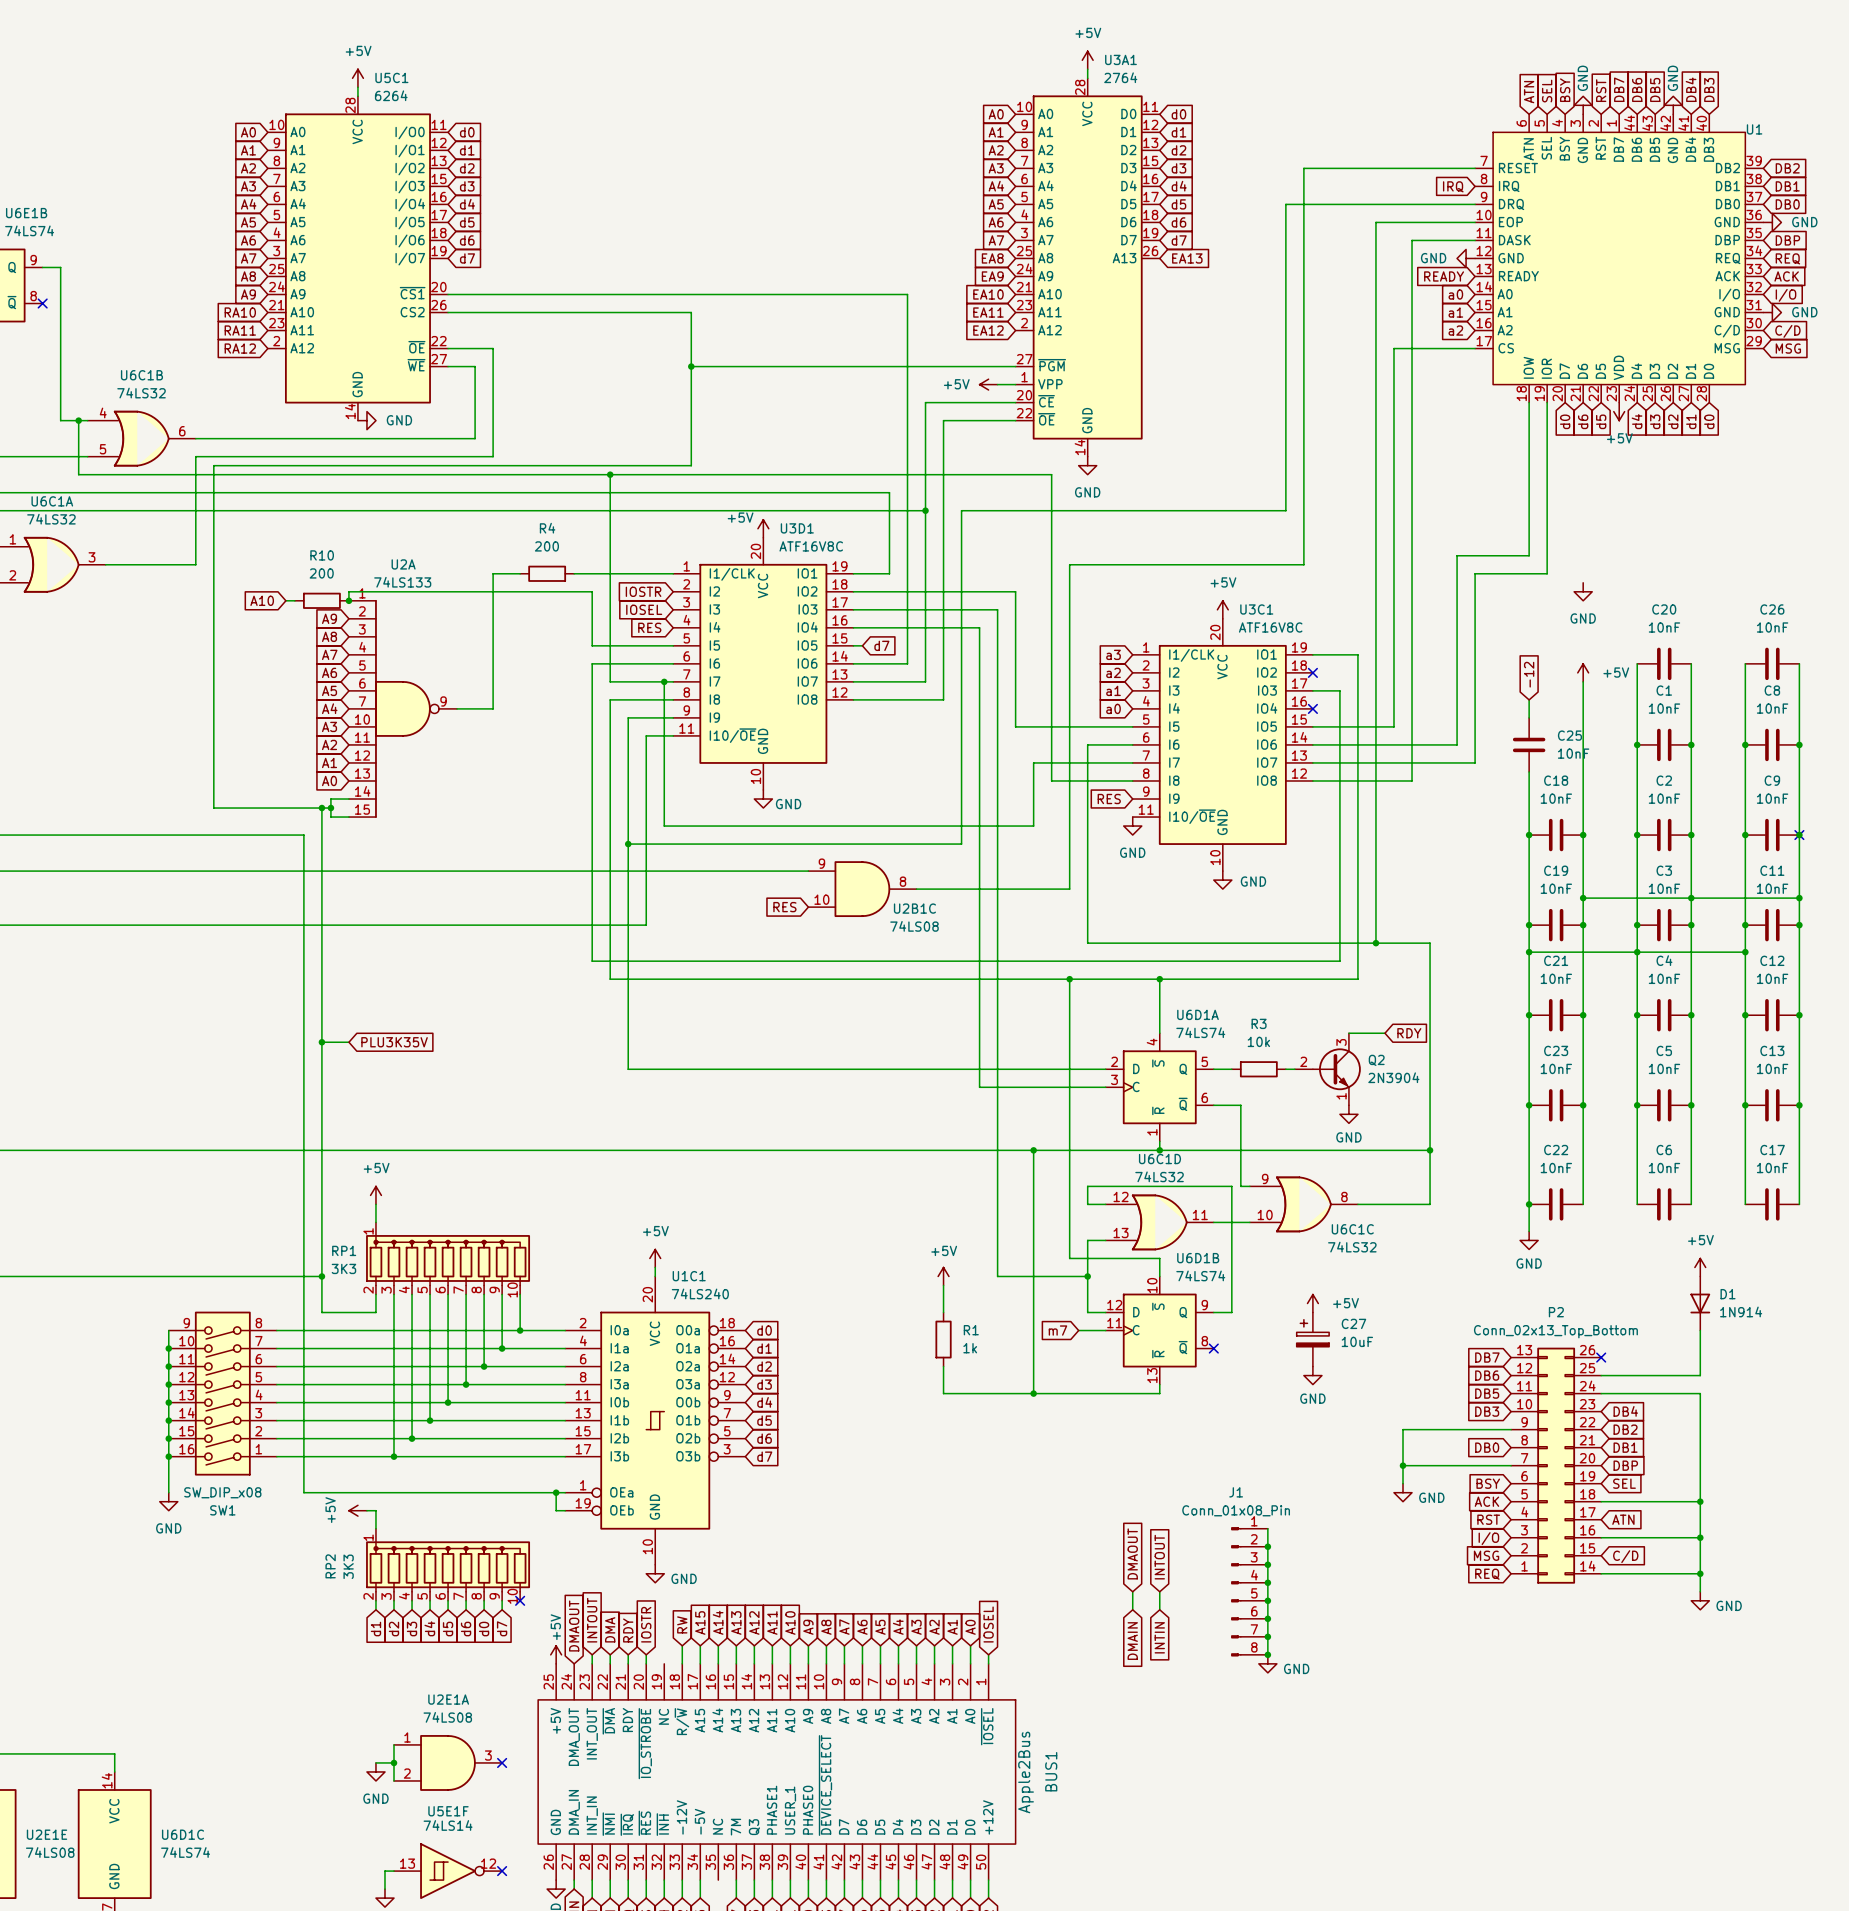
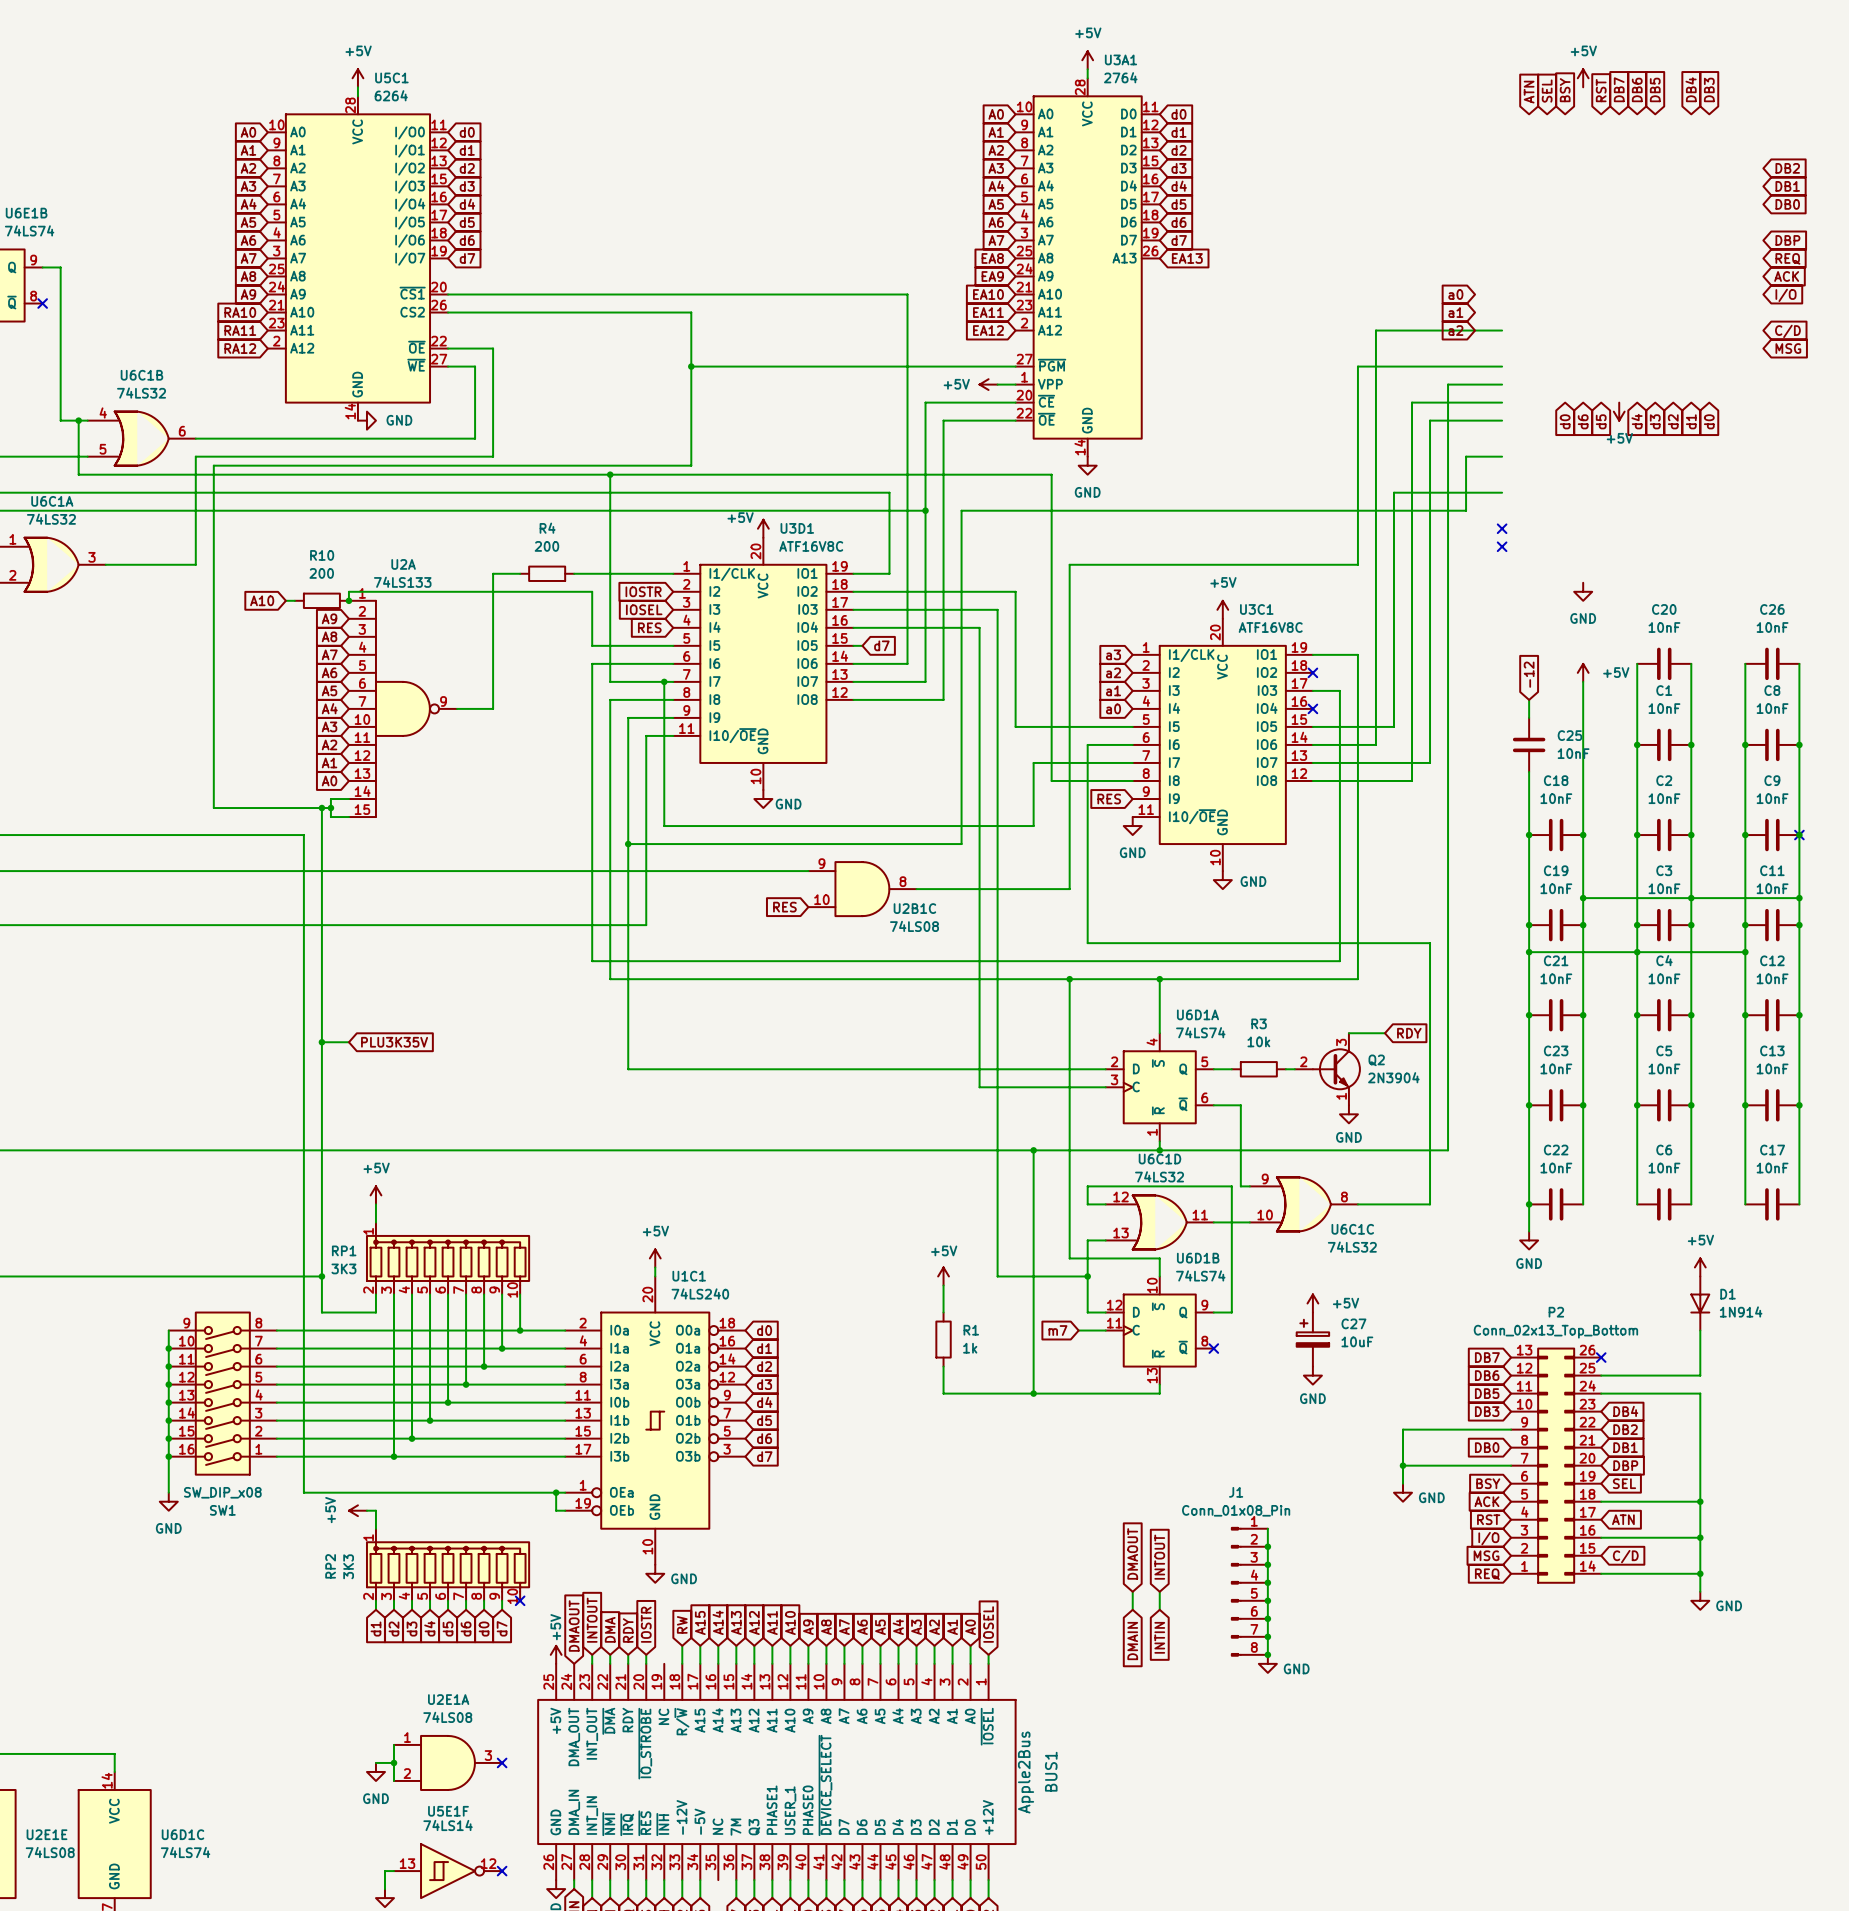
power symbol: none -> +5V (1583, 78)
power symbol: GND (1583, 105) -> none
power symbol: GND (1673, 105) -> none
wire: (1475, 168) (1303, 168) (1303, 564) -> (1502, 366) (1357, 366) (1357, 564) (1303, 564)
global label: IRQ (1453, 186) -> none
wire: (1475, 204) (1285, 204) (1285, 510) -> (1502, 456) (1466, 456) (1466, 510) (1285, 510)
wire: (1475, 222) (1375, 222) (1375, 330) -> (1502, 330) (1375, 330)
power symbol: GND (1772, 222) -> none
wire: (1475, 240) (1412, 240) (1412, 402) -> (1502, 402) (1412, 402)
power symbol: GND (1466, 258) -> none
U1: (1619, 258) -> none
global label: READY (1444, 276) -> none
power symbol: GND (1772, 312) -> none
wire: (1475, 348) (1393, 348) (1393, 492) -> (1502, 492) (1393, 492)
wire: none -> (1502, 384) (1448, 384) (1448, 1150) (1430, 1150)
wire: (1529, 402) (1529, 555) (1457, 555) (1457, 744) (1375, 744) (1375, 943) -> none
wire: (1547, 402) (1547, 573) (1475, 573) (1475, 762) (1430, 762) -> (1502, 420) (1430, 420) (1430, 762)
no-connect mark: none -> (1502, 528)
no-connect mark: none -> (1502, 546)
junction: (1375, 943) -> none
junction: (1430, 1150) -> none

